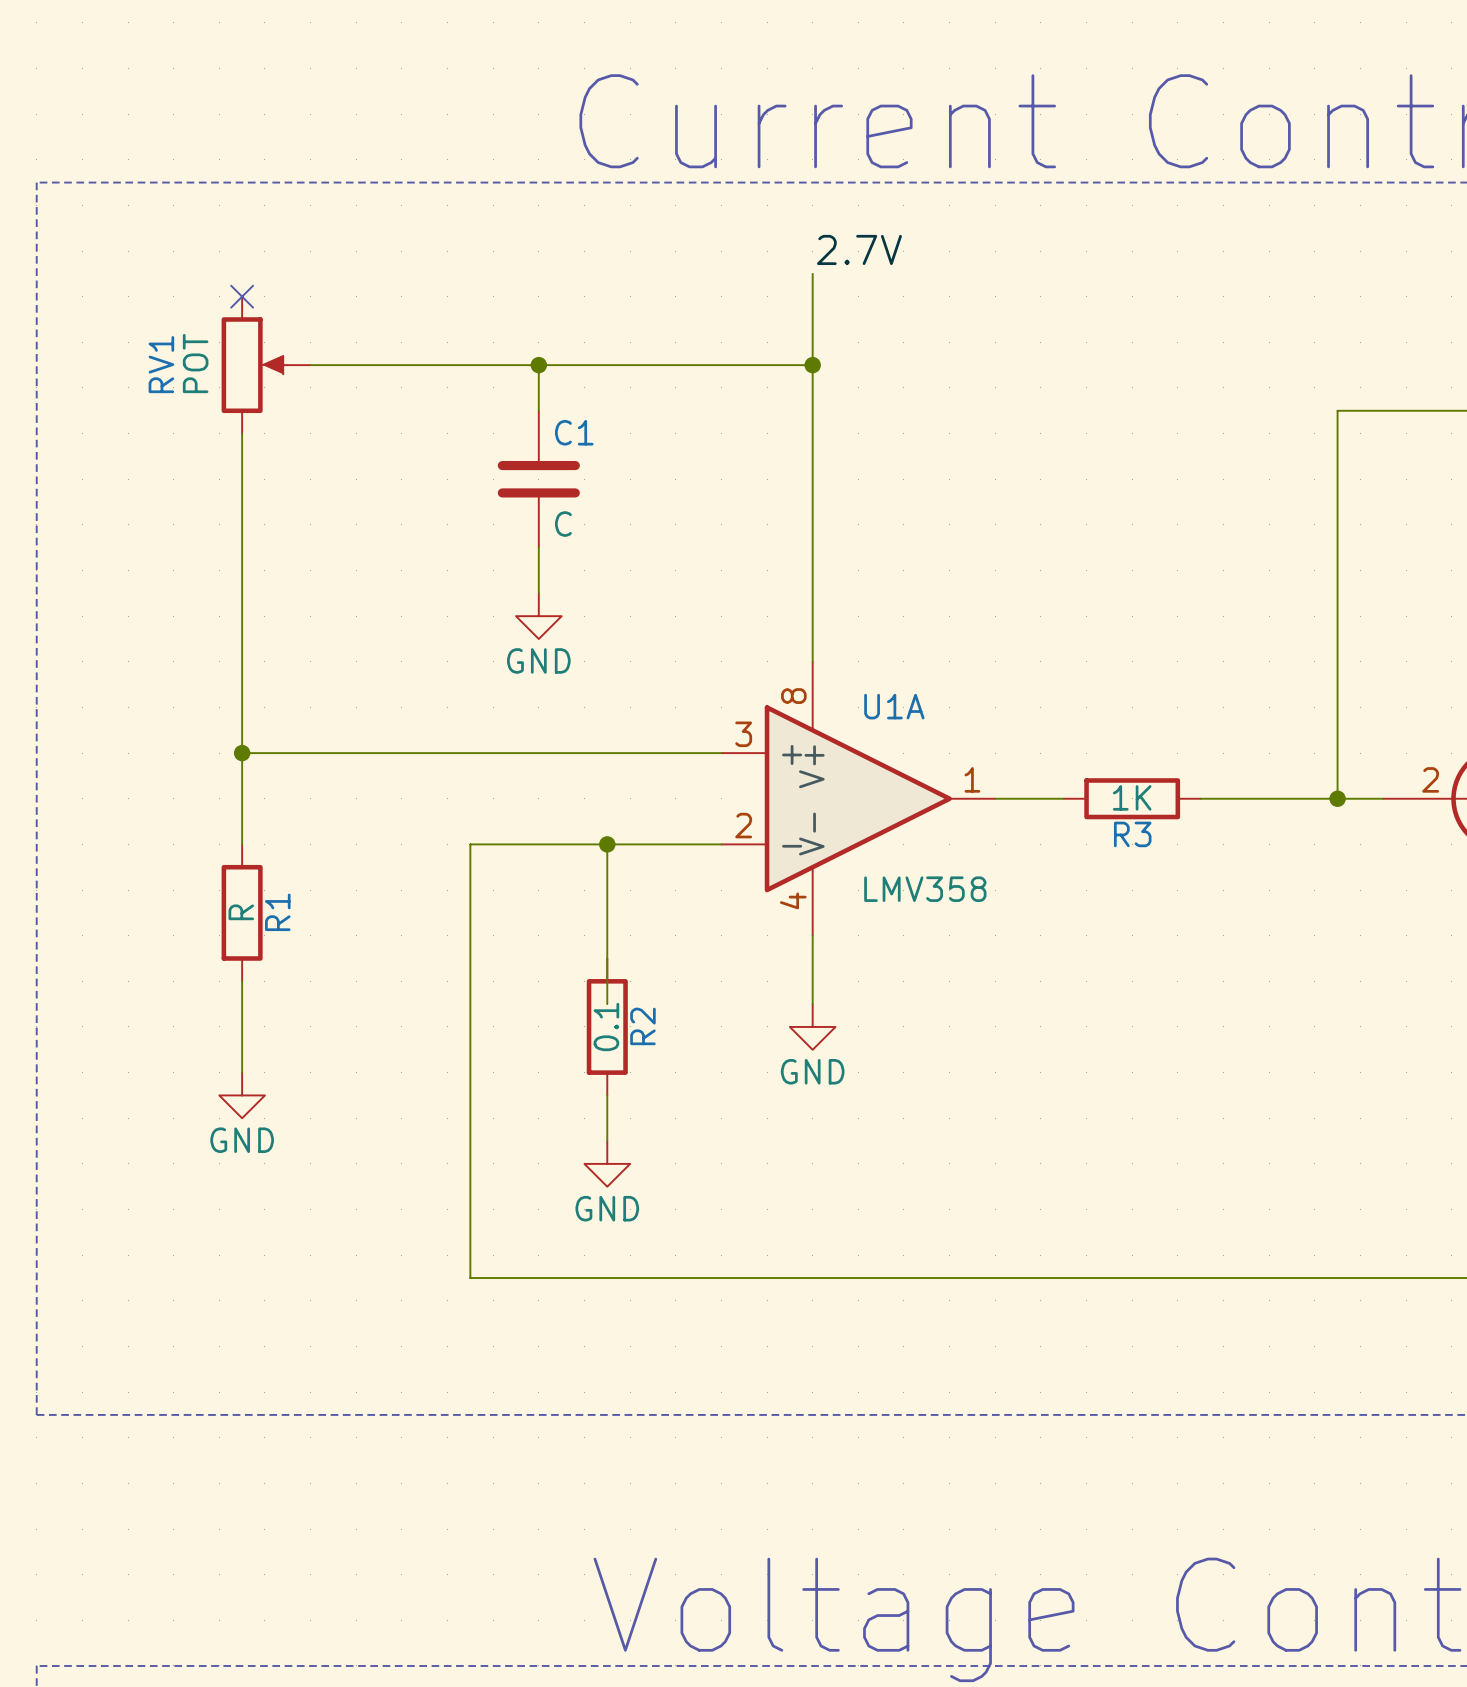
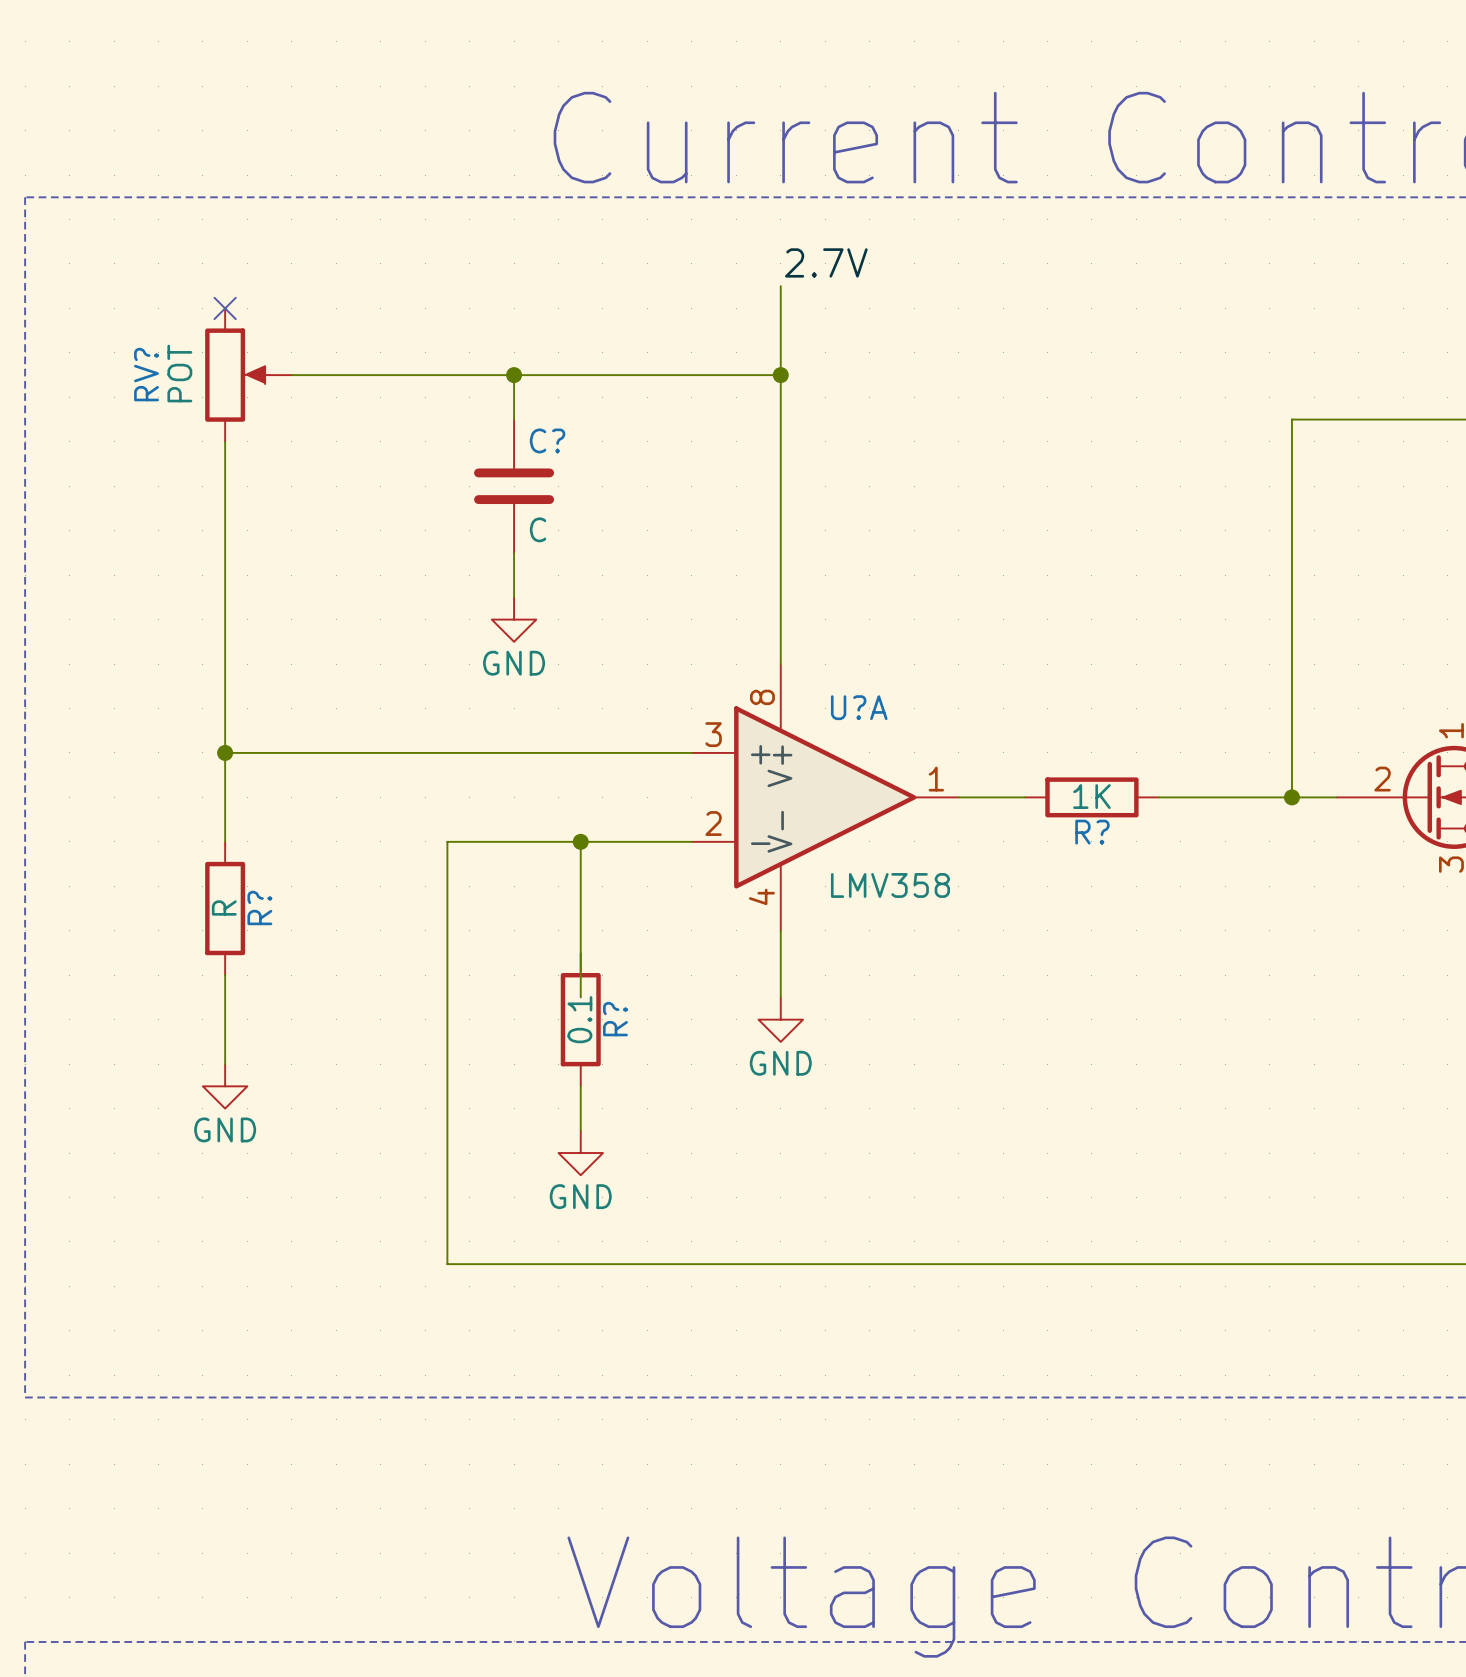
RV1 name: RV1 (161, 364) -> RV? (146, 374)
C1 name: C1 (574, 432) -> C? (547, 440)
U1A name: U1A (894, 706) -> U?A (859, 707)
R3 name: R3 (1132, 834) -> R? (1092, 832)
R1 name: R1 (277, 912) -> R? (259, 908)
R2 name: R2 (642, 1026) -> R? (615, 1019)

